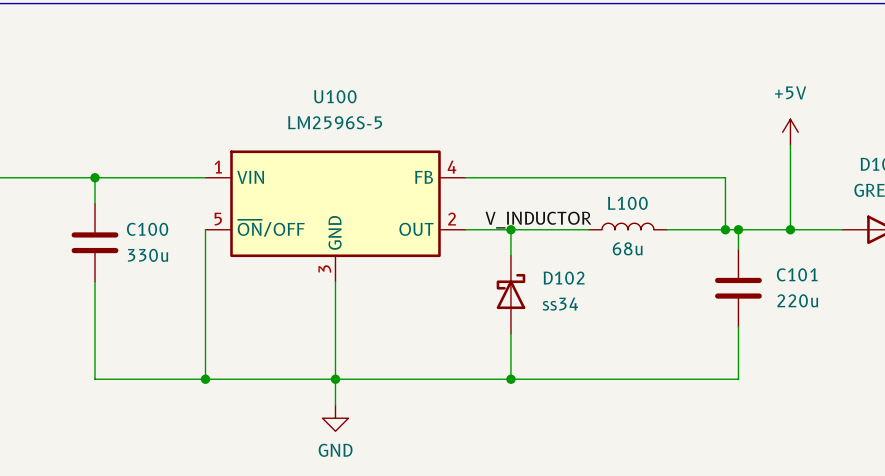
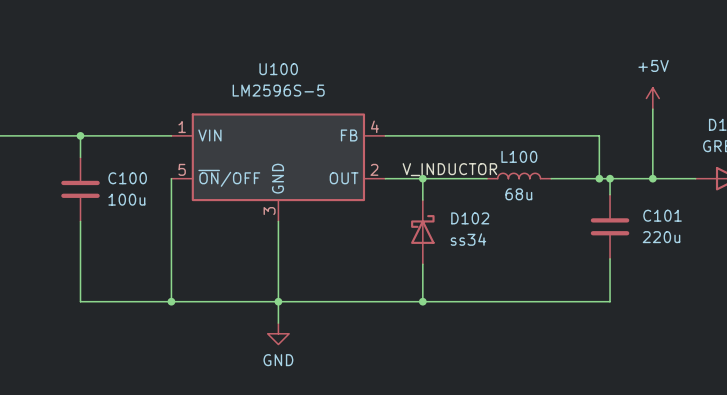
C100 value: 330u (148, 255) -> 100u (126, 199)

